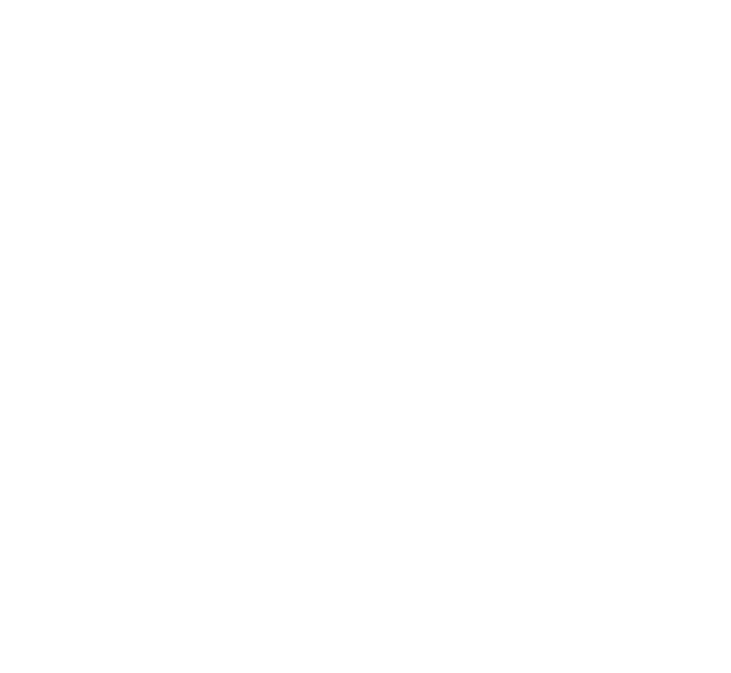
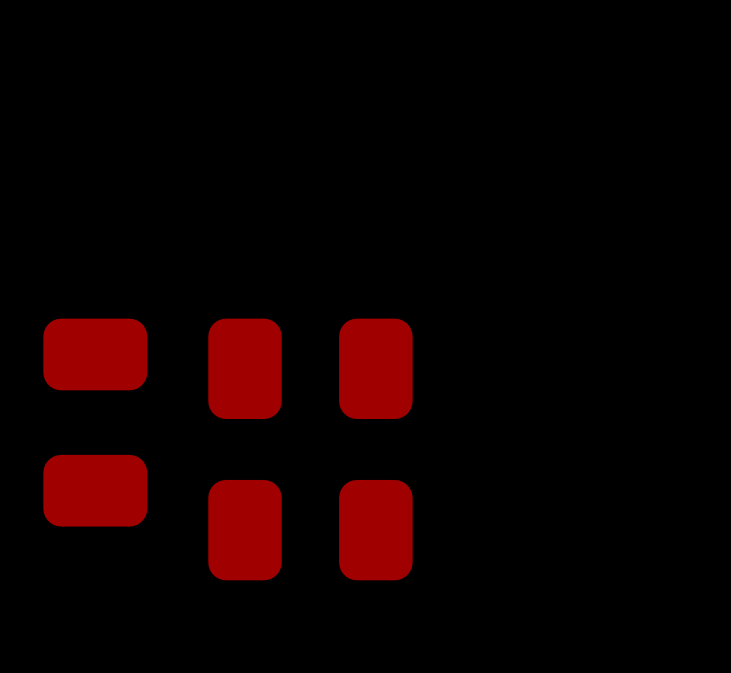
part: none -> (310, 368)
part: none -> (95, 422)
part: none -> (310, 530)

